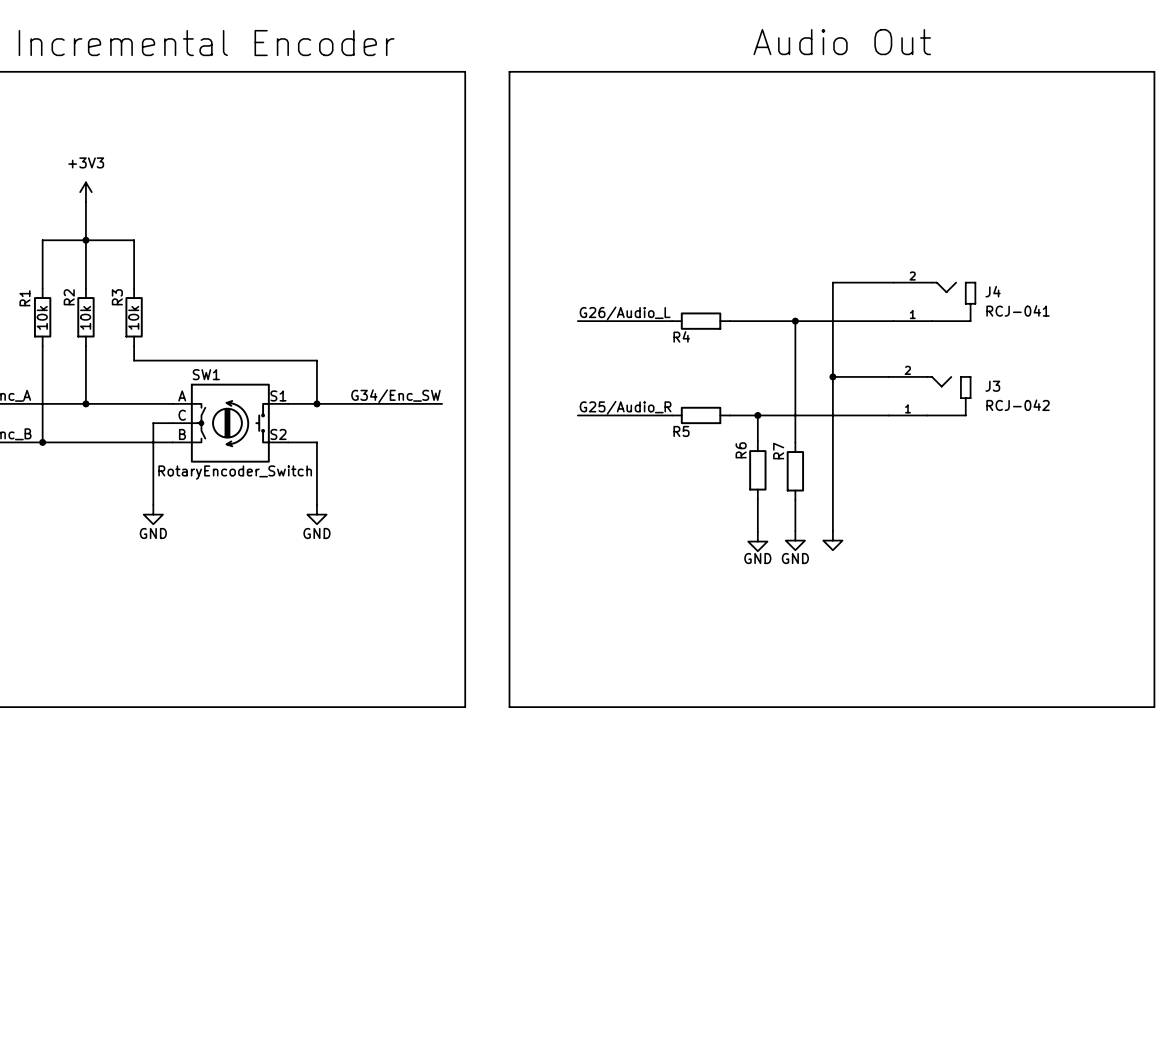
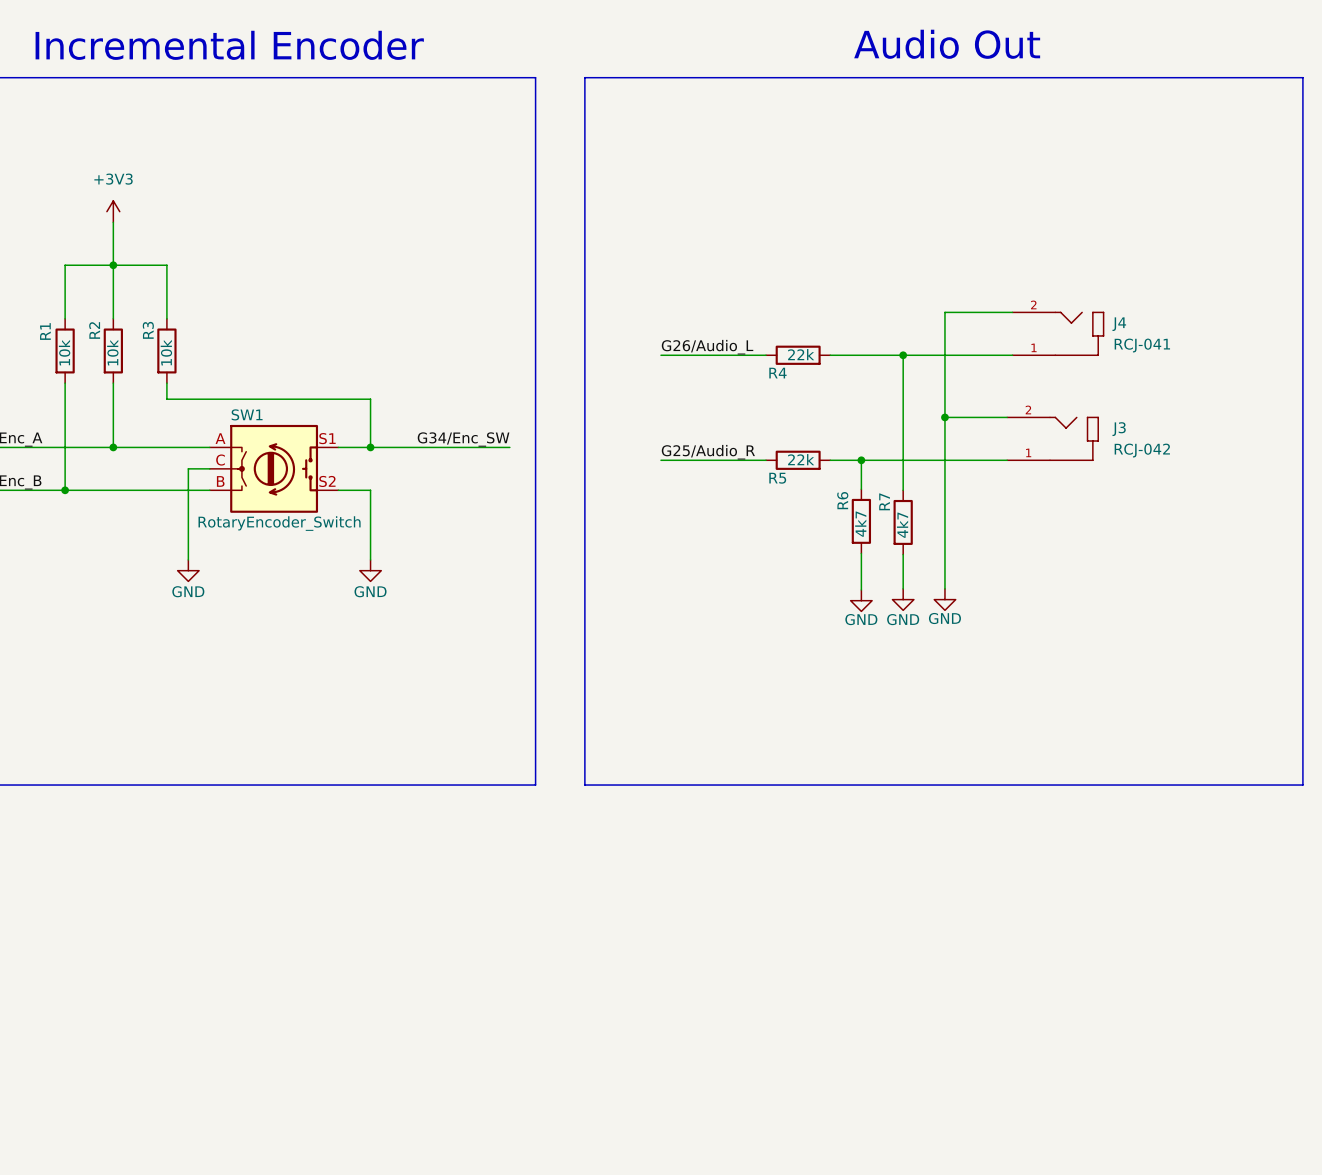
R4 value: none -> 22k (801, 354)
R5 value: none -> 22k (801, 459)
R6 value: none -> 4k7 (860, 524)
R7 value: none -> 4k7 (902, 525)
power symbol text: none -> GND (944, 618)

